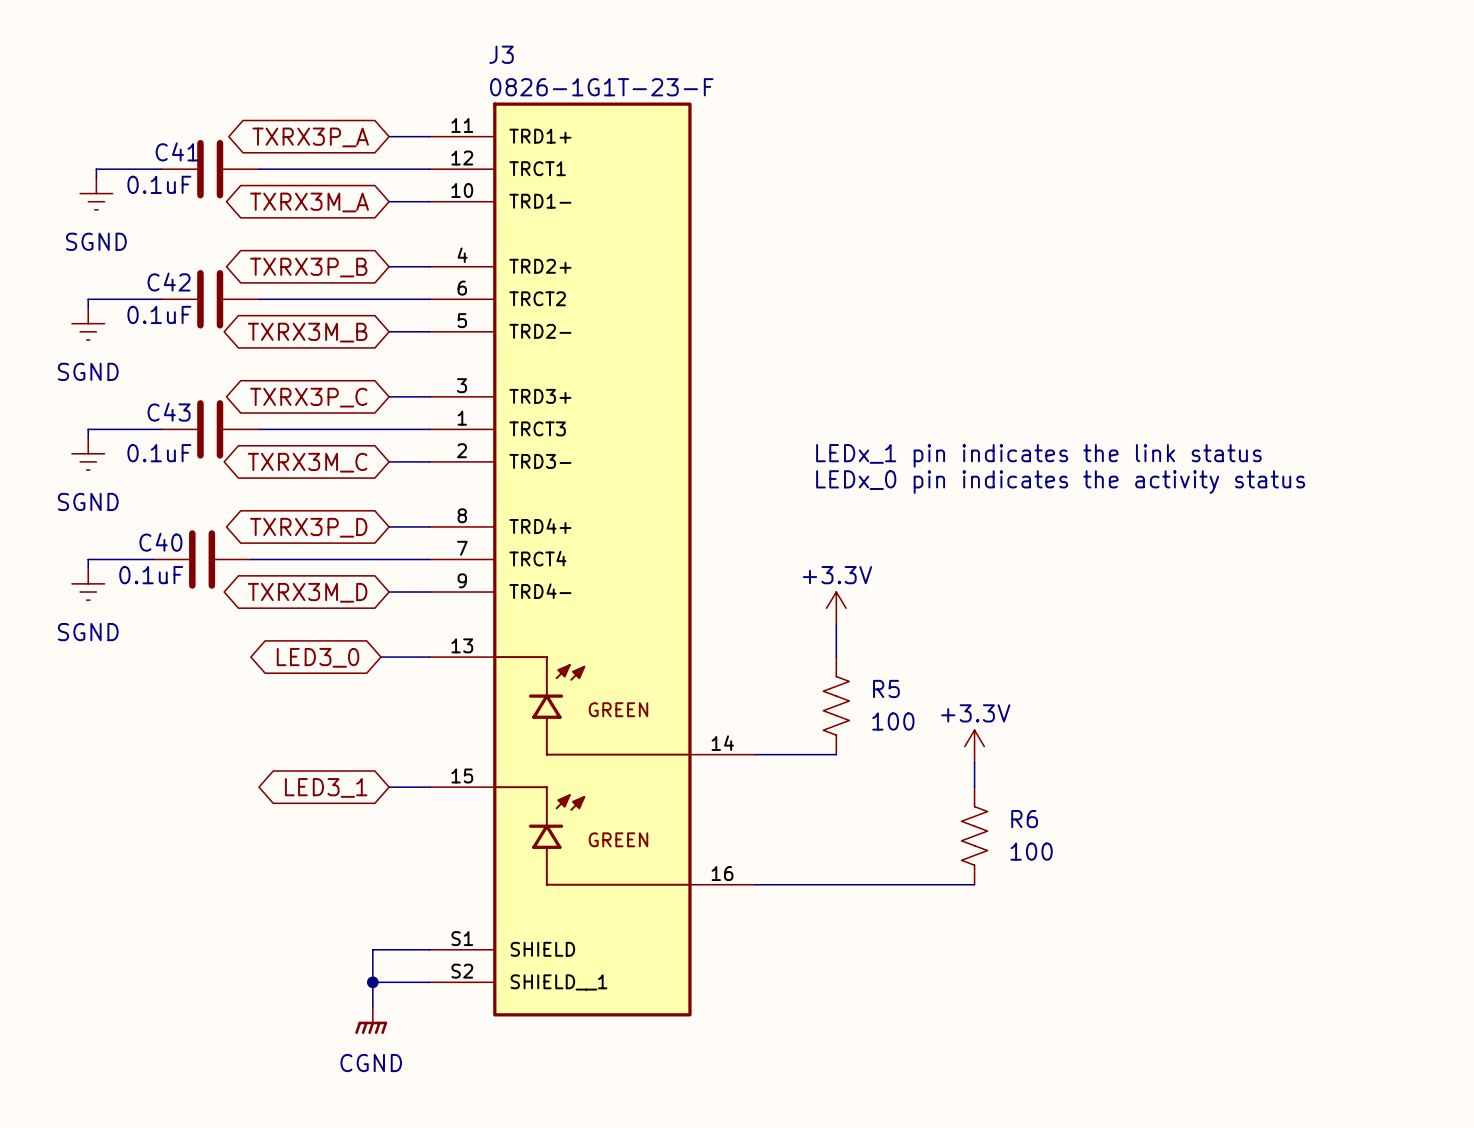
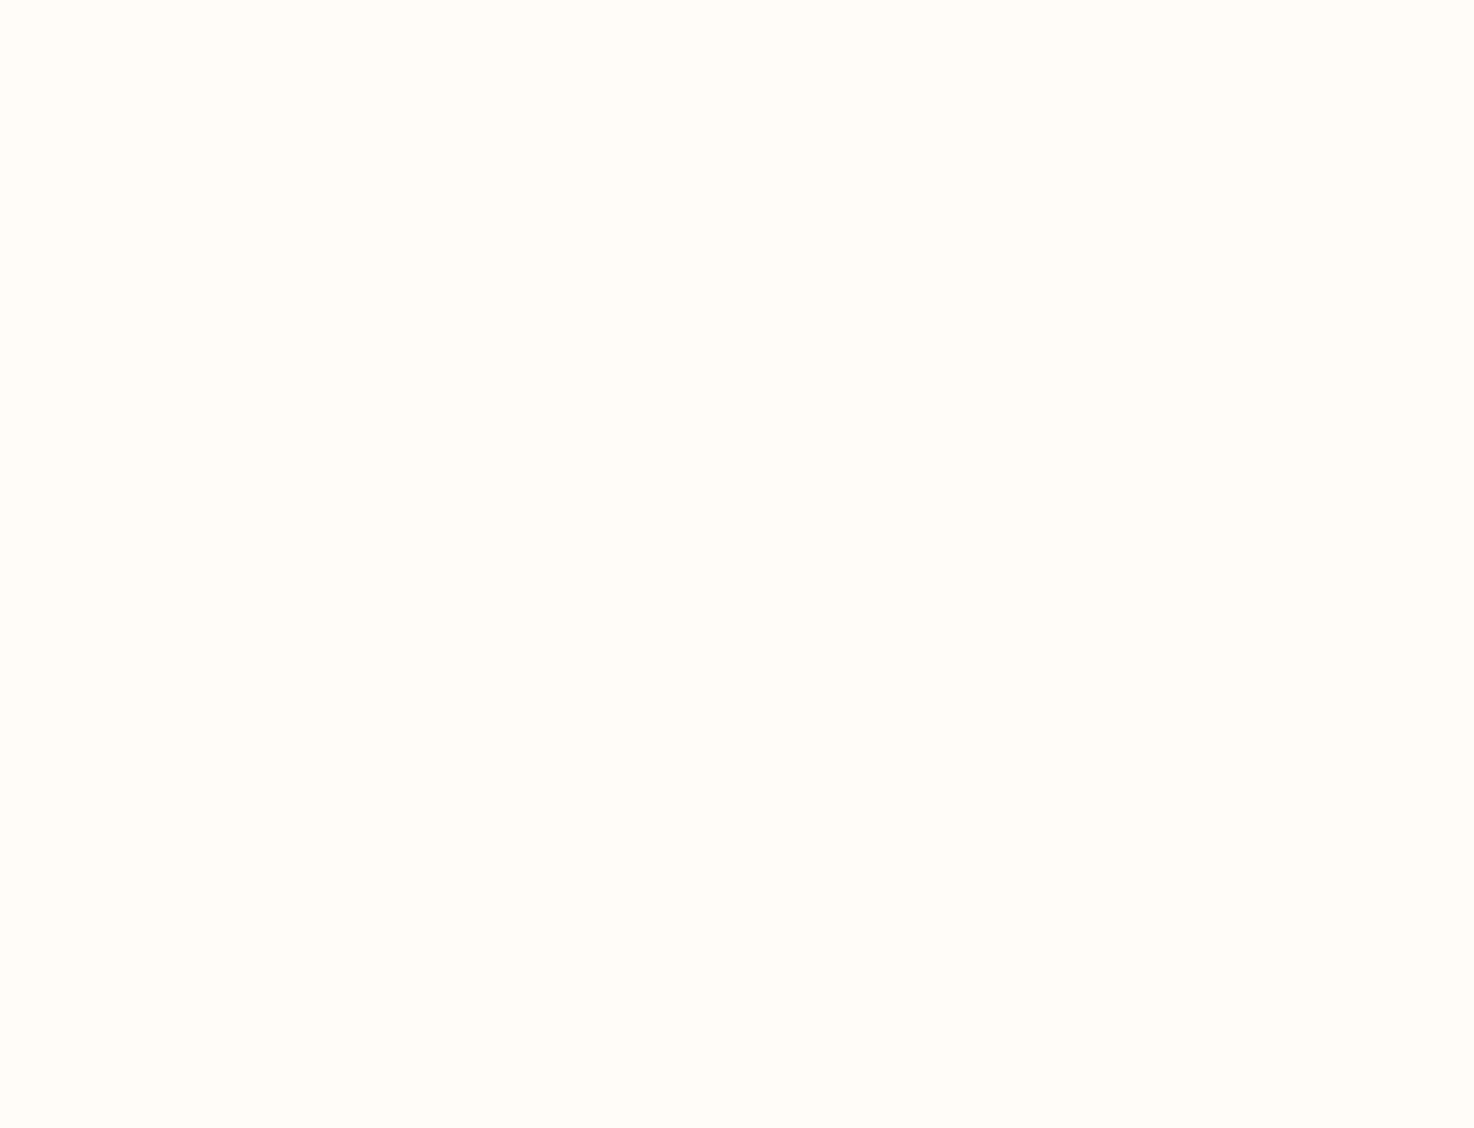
wire: (389, 136) (429, 136) -> none
global label: TXRX3P_A (310, 137) -> none
wire: (161, 169) (96, 169) (96, 177) -> none
C41: 0.1uF (210, 169) -> none
wire: (259, 169) (429, 169) -> none
power symbol: SGND (96, 193) -> none
wire: (389, 201) (429, 201) -> none
global label: TXRX3M_A (309, 202) -> none
wire: (389, 266) (429, 266) -> none
global label: TXRX3P_B (308, 267) -> none
wire: (161, 299) (88, 299) (88, 307) -> none
C42: 0.1uF (210, 299) -> none
wire: (259, 299) (429, 299) -> none
power symbol: SGND (88, 323) -> none
wire: (389, 331) (429, 331) -> none
global label: TXRX3M_B (307, 332) -> none
wire: (389, 396) (429, 396) -> none
global label: TXRX3P_C (308, 397) -> none
wire: (161, 429) (88, 429) (88, 437) -> none
C43: 0.1uF (210, 429) -> none
wire: (259, 429) (429, 429) -> none
power symbol: SGND (88, 453) -> none
text: LEDx_1 pin indicates the link status (1038, 455) -> none
wire: (389, 461) (429, 461) -> none
global label: TXRX3M_C (307, 462) -> none
text: LEDx_0 pin indicates the activity status (1060, 482) -> none
wire: (389, 526) (429, 526) -> none
global label: TXRX3P_D (308, 527) -> none
wire: (153, 559) (88, 559) (88, 567) -> none
C40: 0.1uF (202, 559) -> none
wire: (250, 559) (429, 559) -> none
J3: 0826-1G1T-23-F (592, 559) -> none
power symbol: SGND (88, 583) -> none
global label: TXRX3M_D (307, 592) -> none
wire: (389, 592) (429, 592) -> none
power symbol: +3.3V (836, 608) -> none
wire: (836, 624) (836, 657) -> none
global label: LED3_0 (318, 657) -> none
wire: (380, 657) (429, 657) -> none
R5: 100 (836, 705) -> none
power symbol: +3.3V (974, 746) -> none
wire: (755, 754) (836, 754) -> none
wire: (974, 762) (974, 787) -> none
global label: LED3_1 (326, 787) -> none
wire: (389, 787) (429, 787) -> none
R6: 100 (974, 835) -> none
wire: (755, 884) (974, 884) -> none
wire: (429, 949) (372, 949) (372, 1006) -> none
wire: (372, 982) (429, 982) -> none
junction: (372, 982) -> none
power symbol: CGND (371, 1020) -> none

